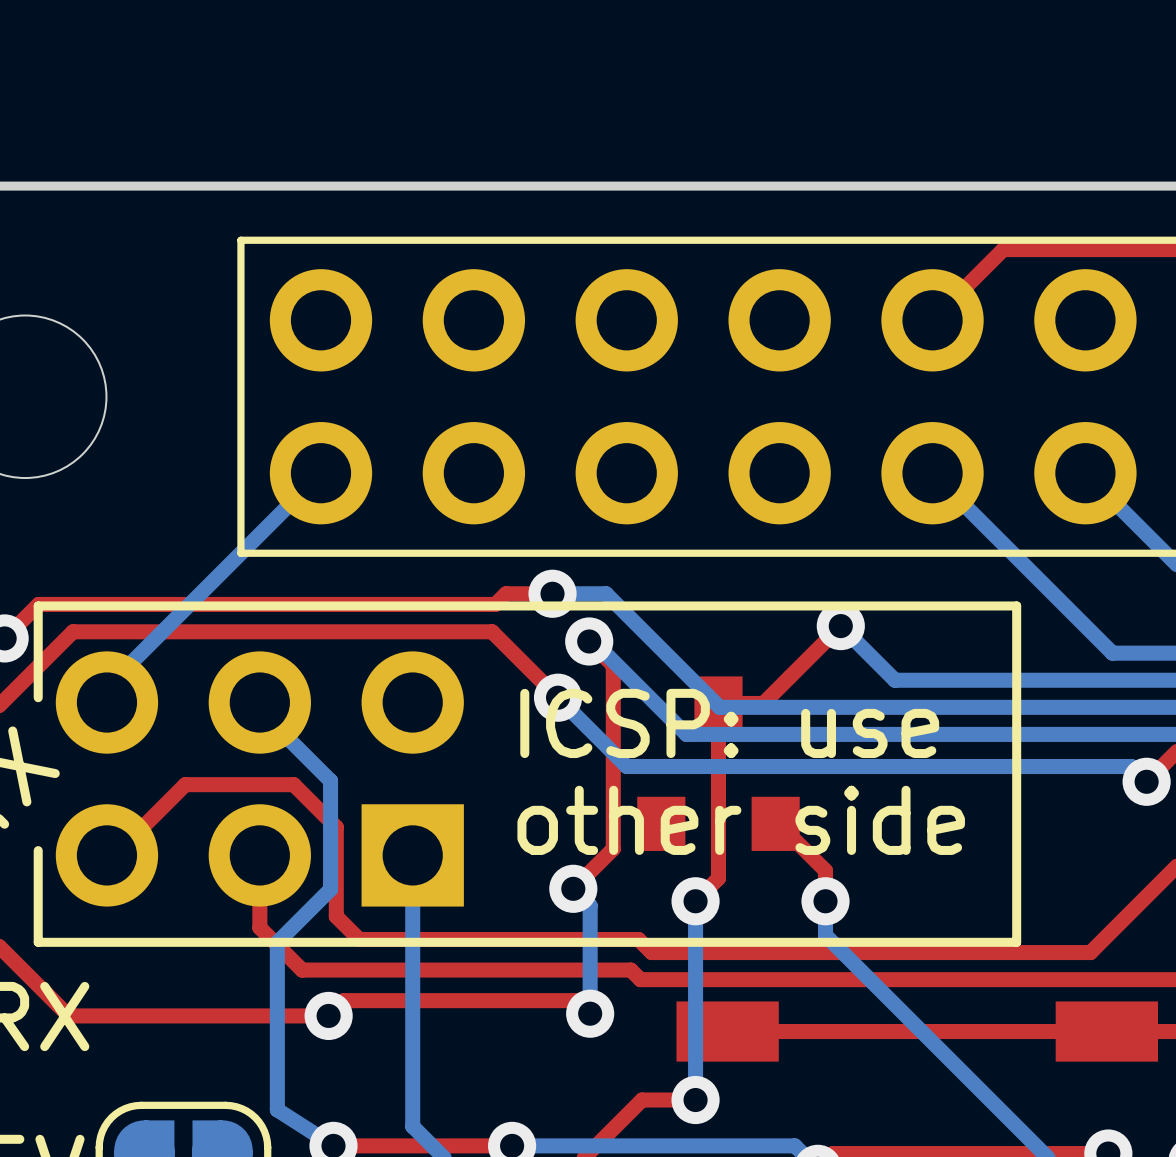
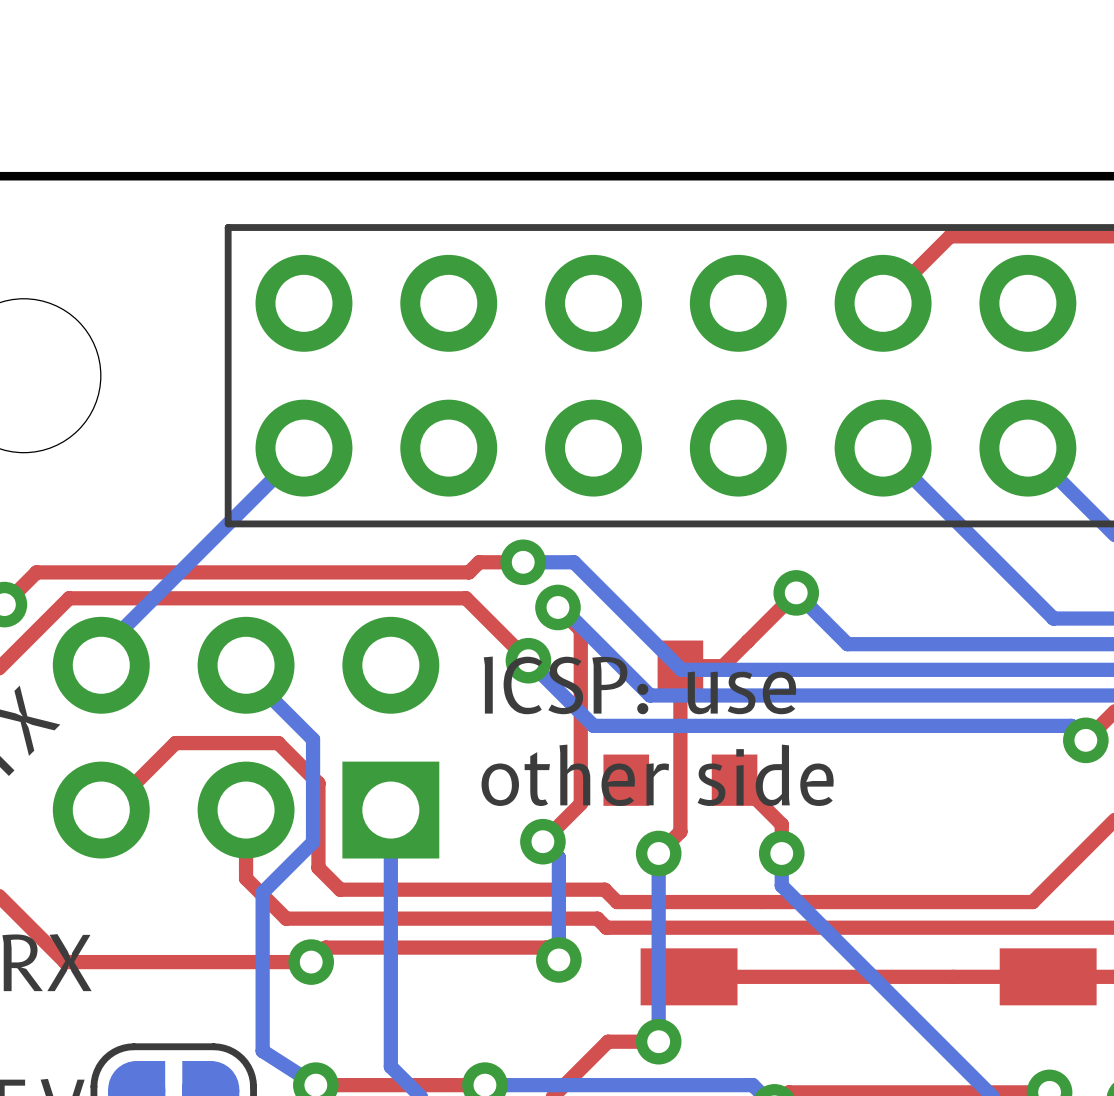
line: (38, 697) (38, 605) (1016, 605) (1016, 942) (38, 942) (38, 850) -> none

